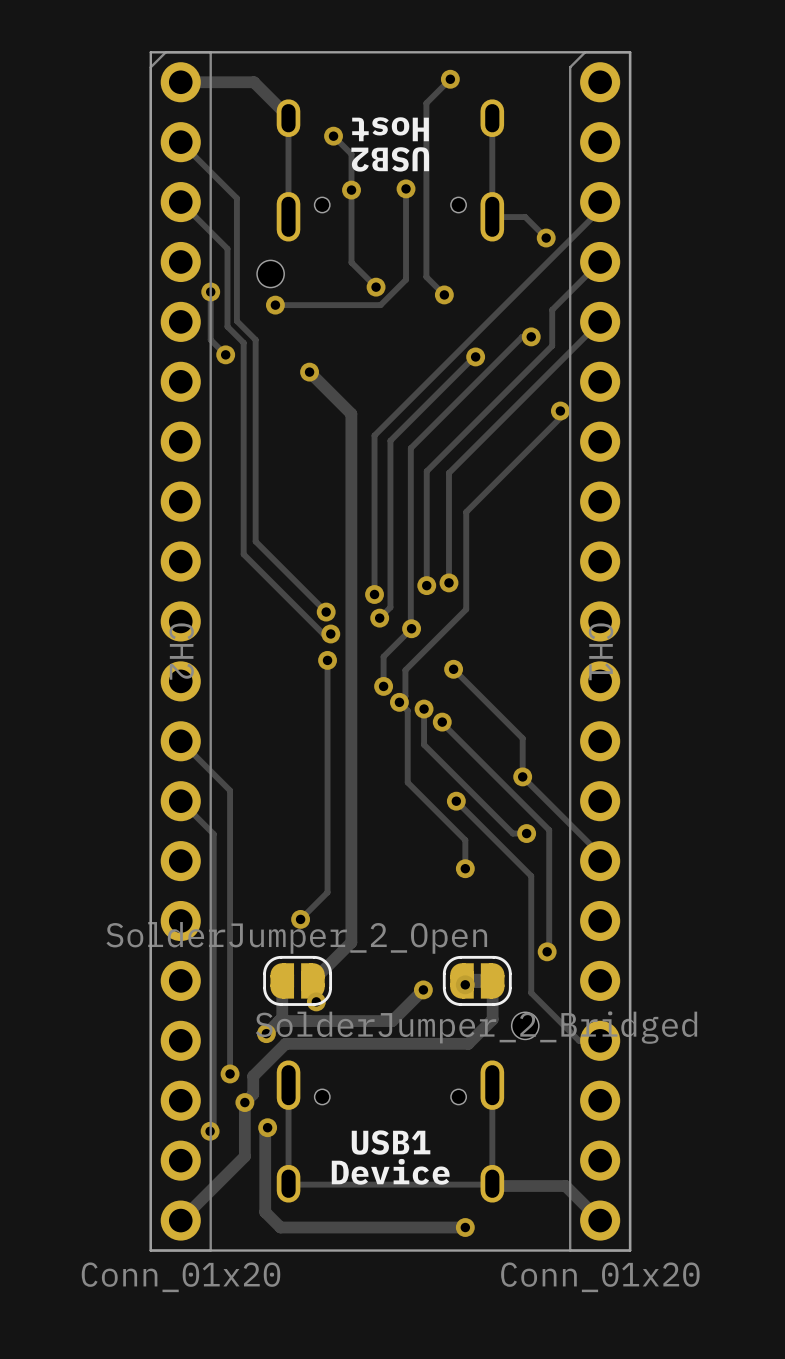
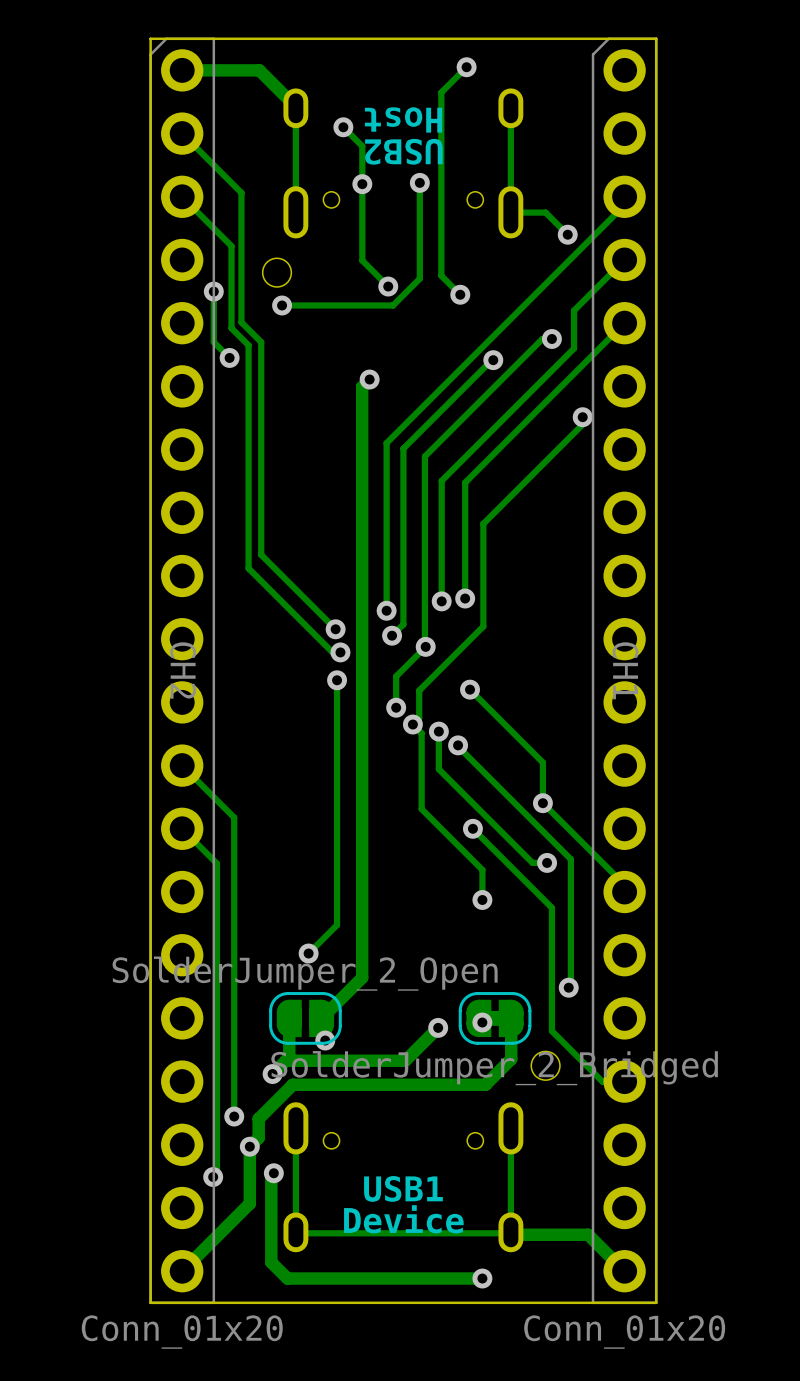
track: (309, 372) (351, 413) -> (369, 379) (362, 386) (362, 420)
via position: (309, 372) -> (369, 379)

